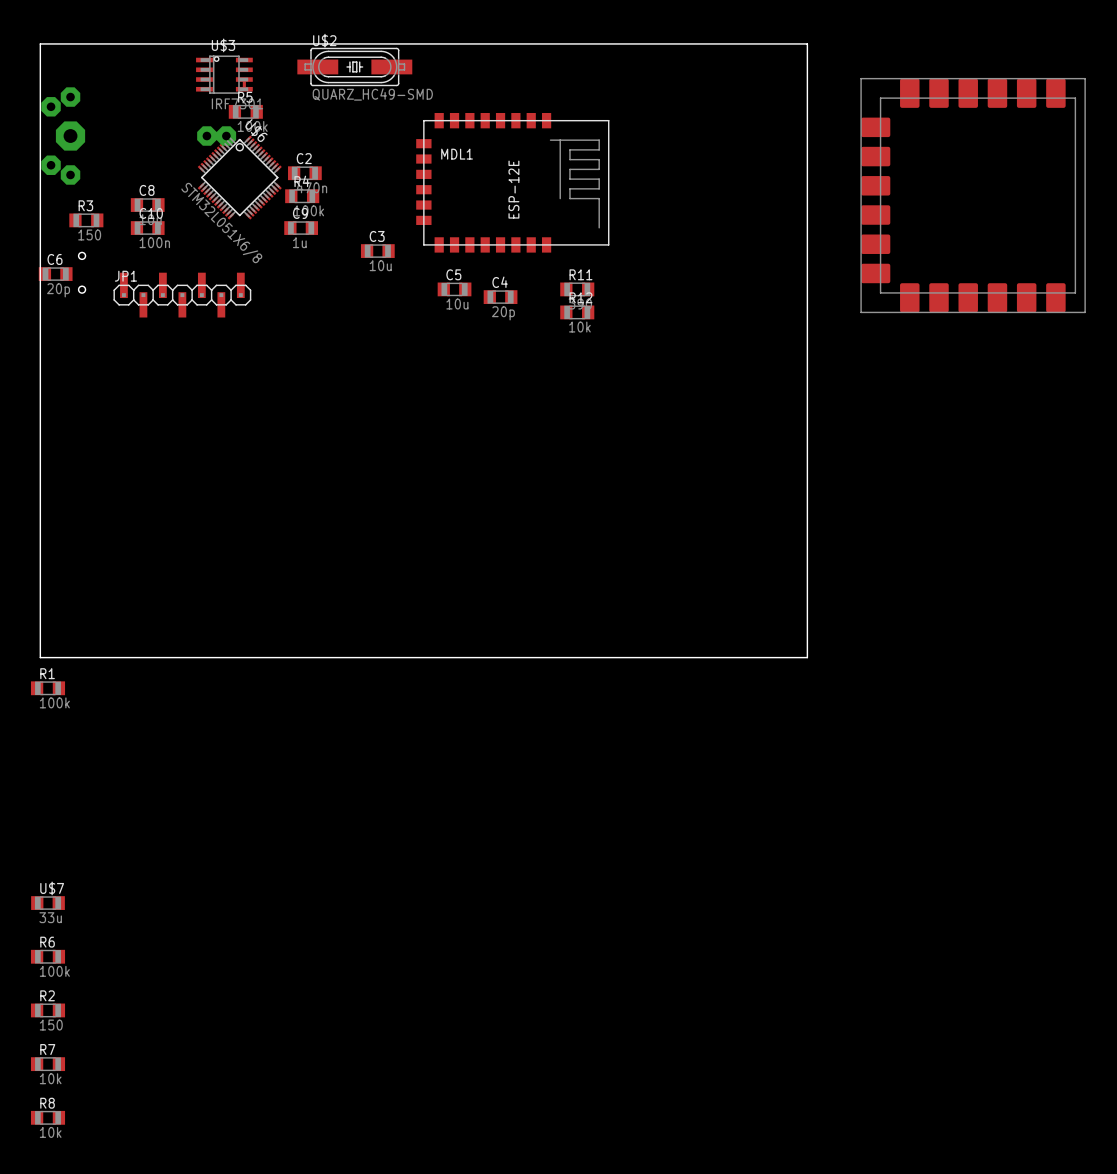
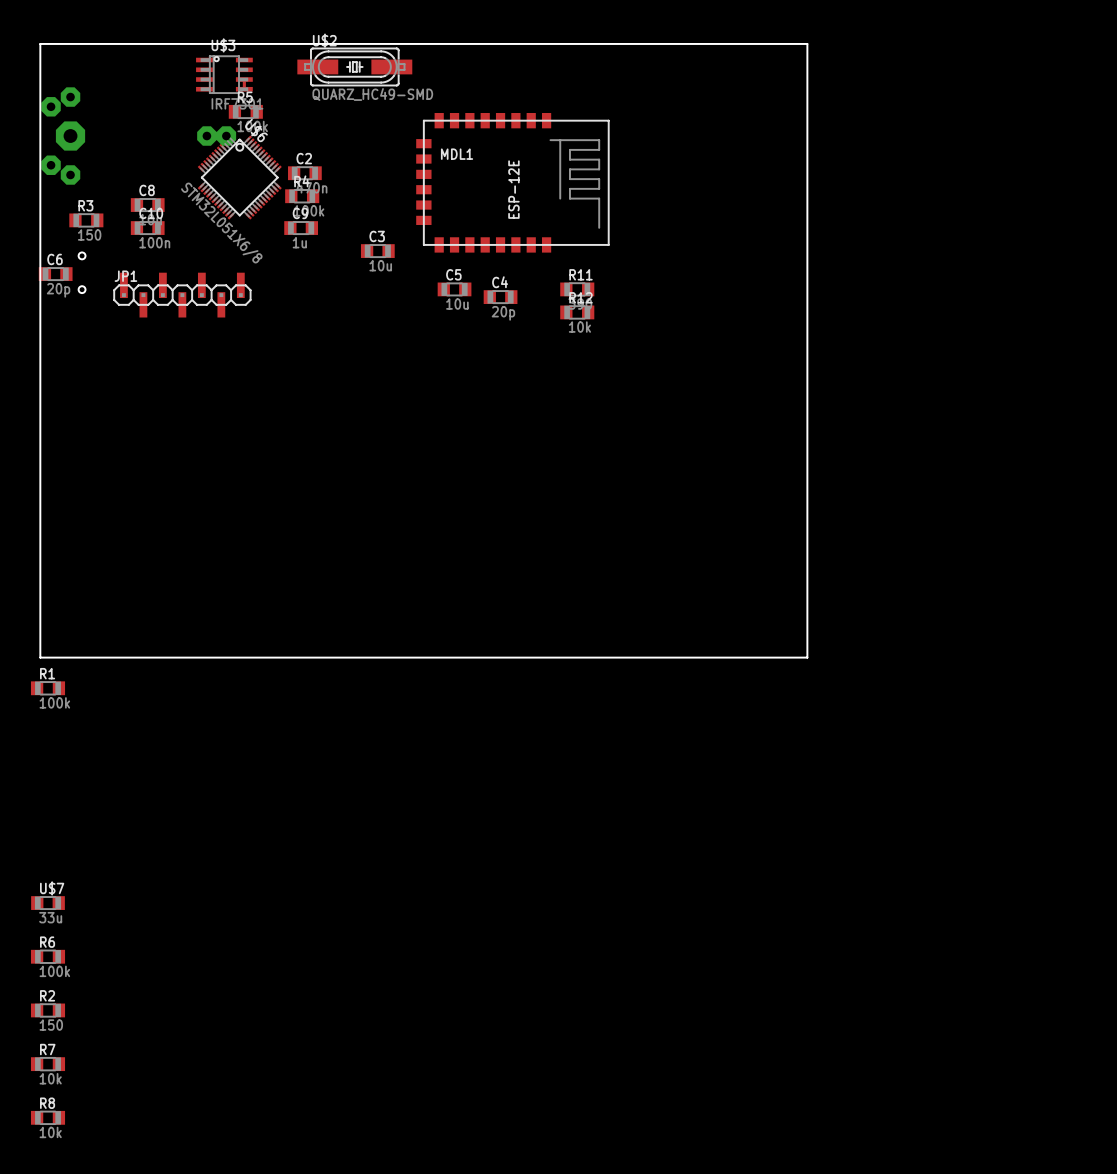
part: (973, 195) -> none

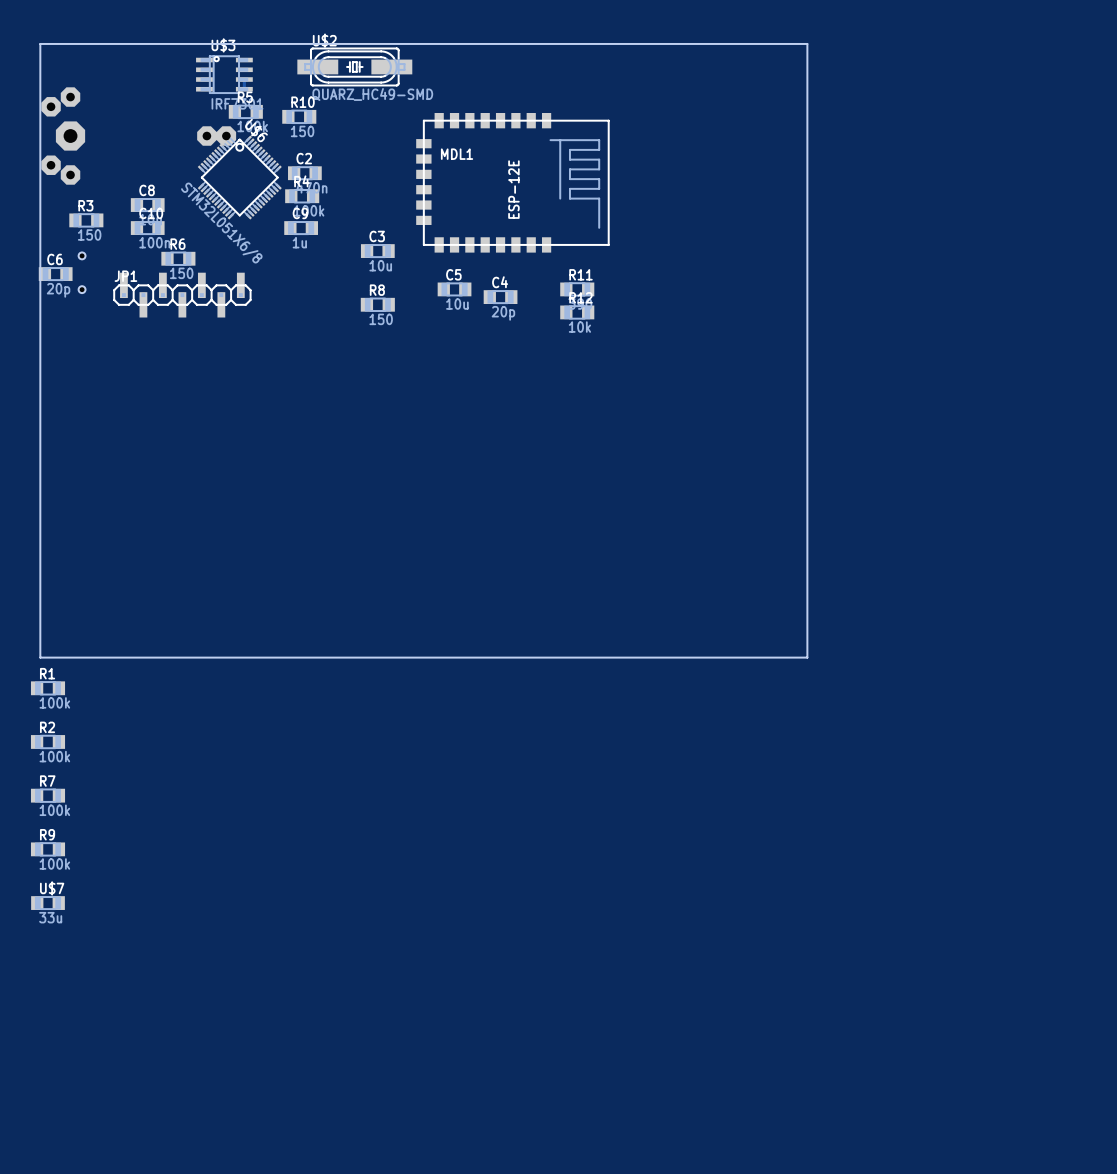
R10: none -> 150 (299, 116)
R9: none -> 100k (48, 849)
R6 position: (48, 956) -> (178, 258)
R6 value: 100k (54, 971) -> 150 (181, 273)
R2 position: (48, 1010) -> (48, 741)
R2 value: 150 (51, 1025) -> 100k (54, 756)
R7 position: (48, 1064) -> (48, 795)
R7 value: 10k (50, 1078) -> 100k (54, 810)
R8 position: (48, 1117) -> (377, 304)
R8 value: 10k (50, 1132) -> 150 (381, 319)

